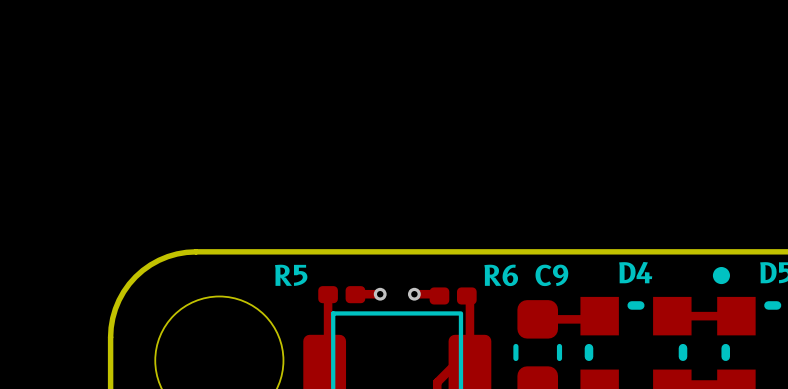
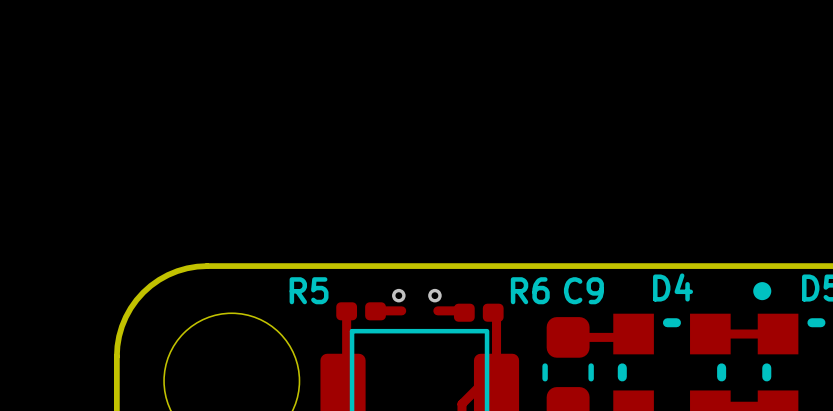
via position: (380, 294) -> (398, 295)
via position: (414, 294) -> (434, 295)

